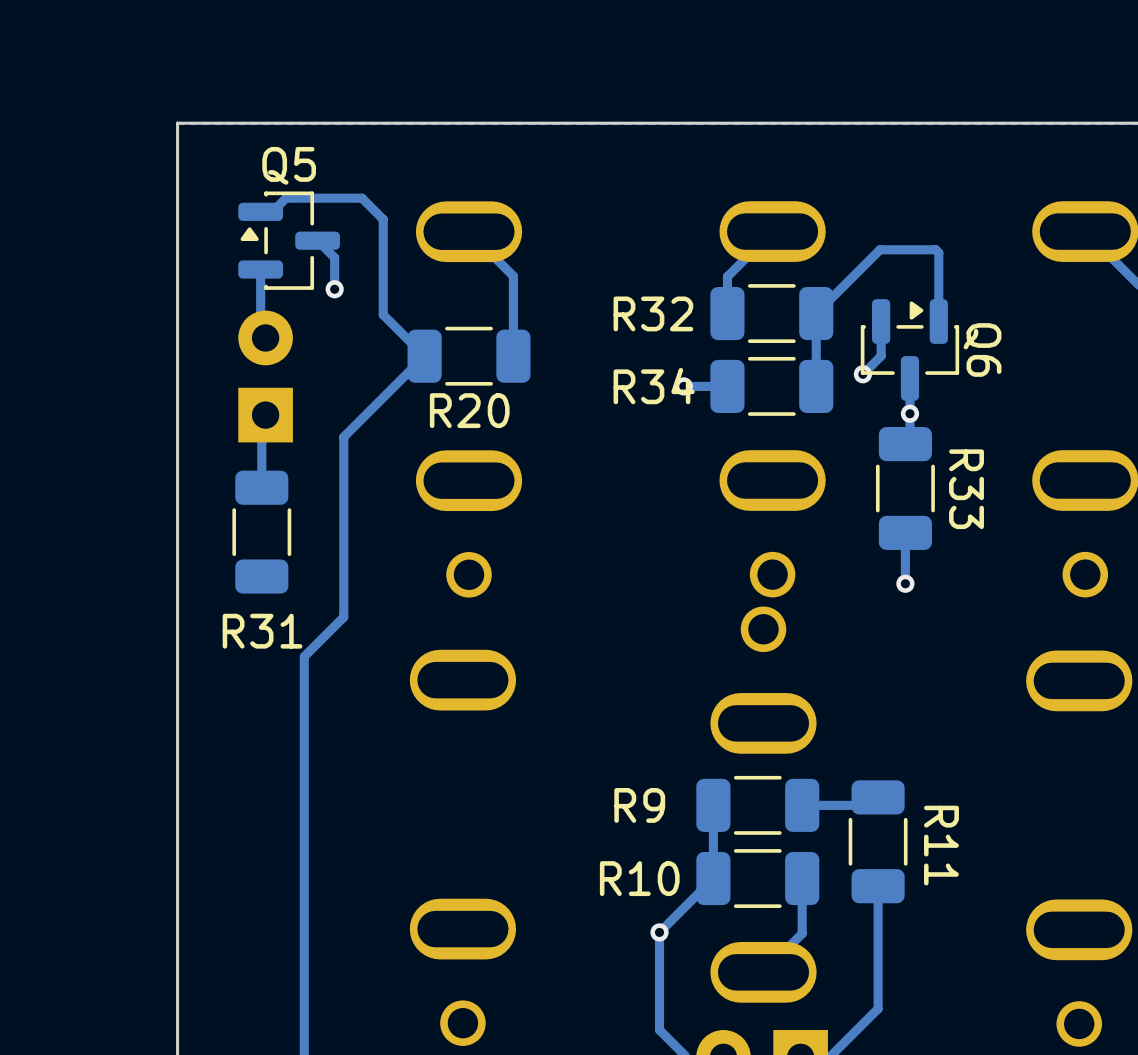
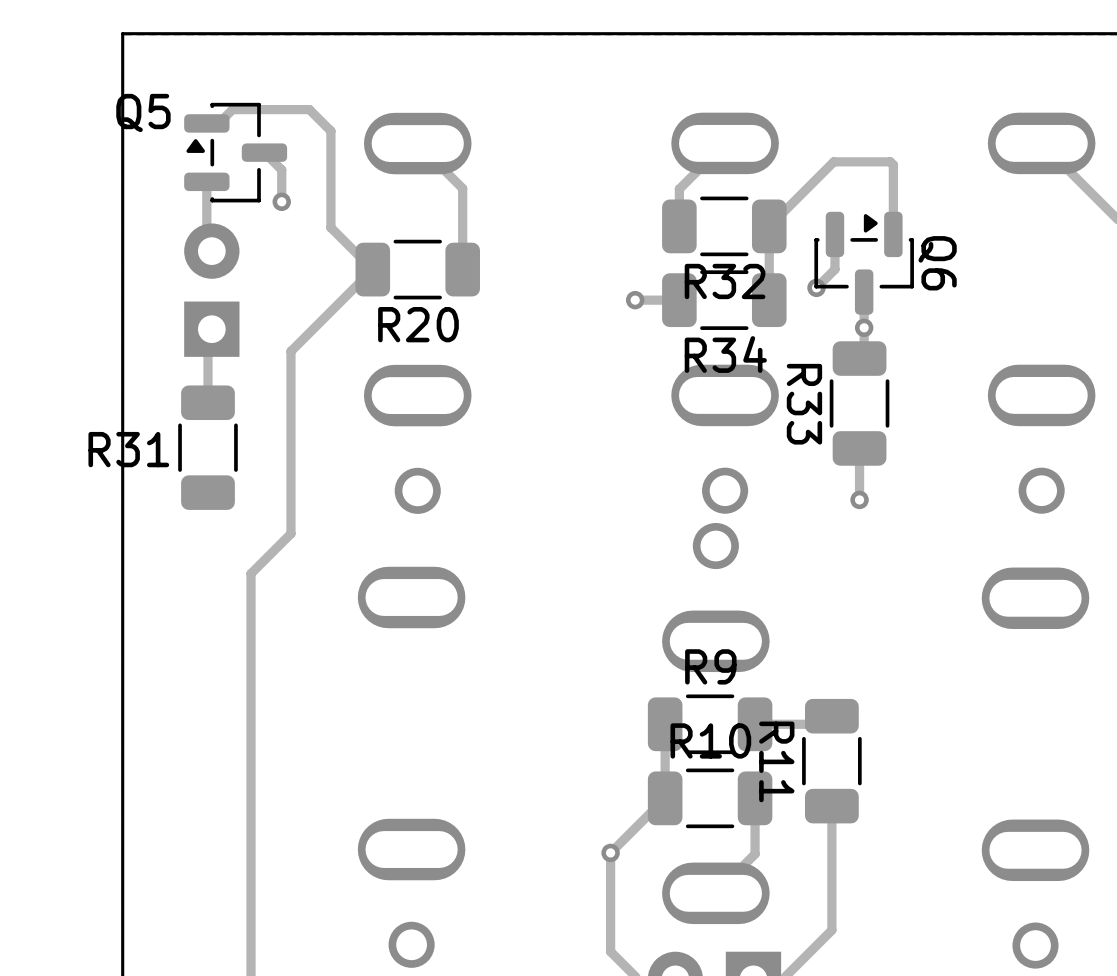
Q5 name position: Q5 (289, 165) -> Q5 (143, 112)
R32 name position: R32 (653, 313) -> R32 (725, 281)
R34 name position: R34 (654, 386) -> R34 (725, 354)
R33 name position: R33 (966, 489) -> R33 (804, 404)
R31 name position: R31 (262, 631) -> R31 (128, 449)
R9 name position: R9 (639, 805) -> R9 (710, 666)
R11 name position: R11 (941, 845) -> R11 (776, 761)
R10 name position: R10 (639, 878) -> R10 (710, 740)

